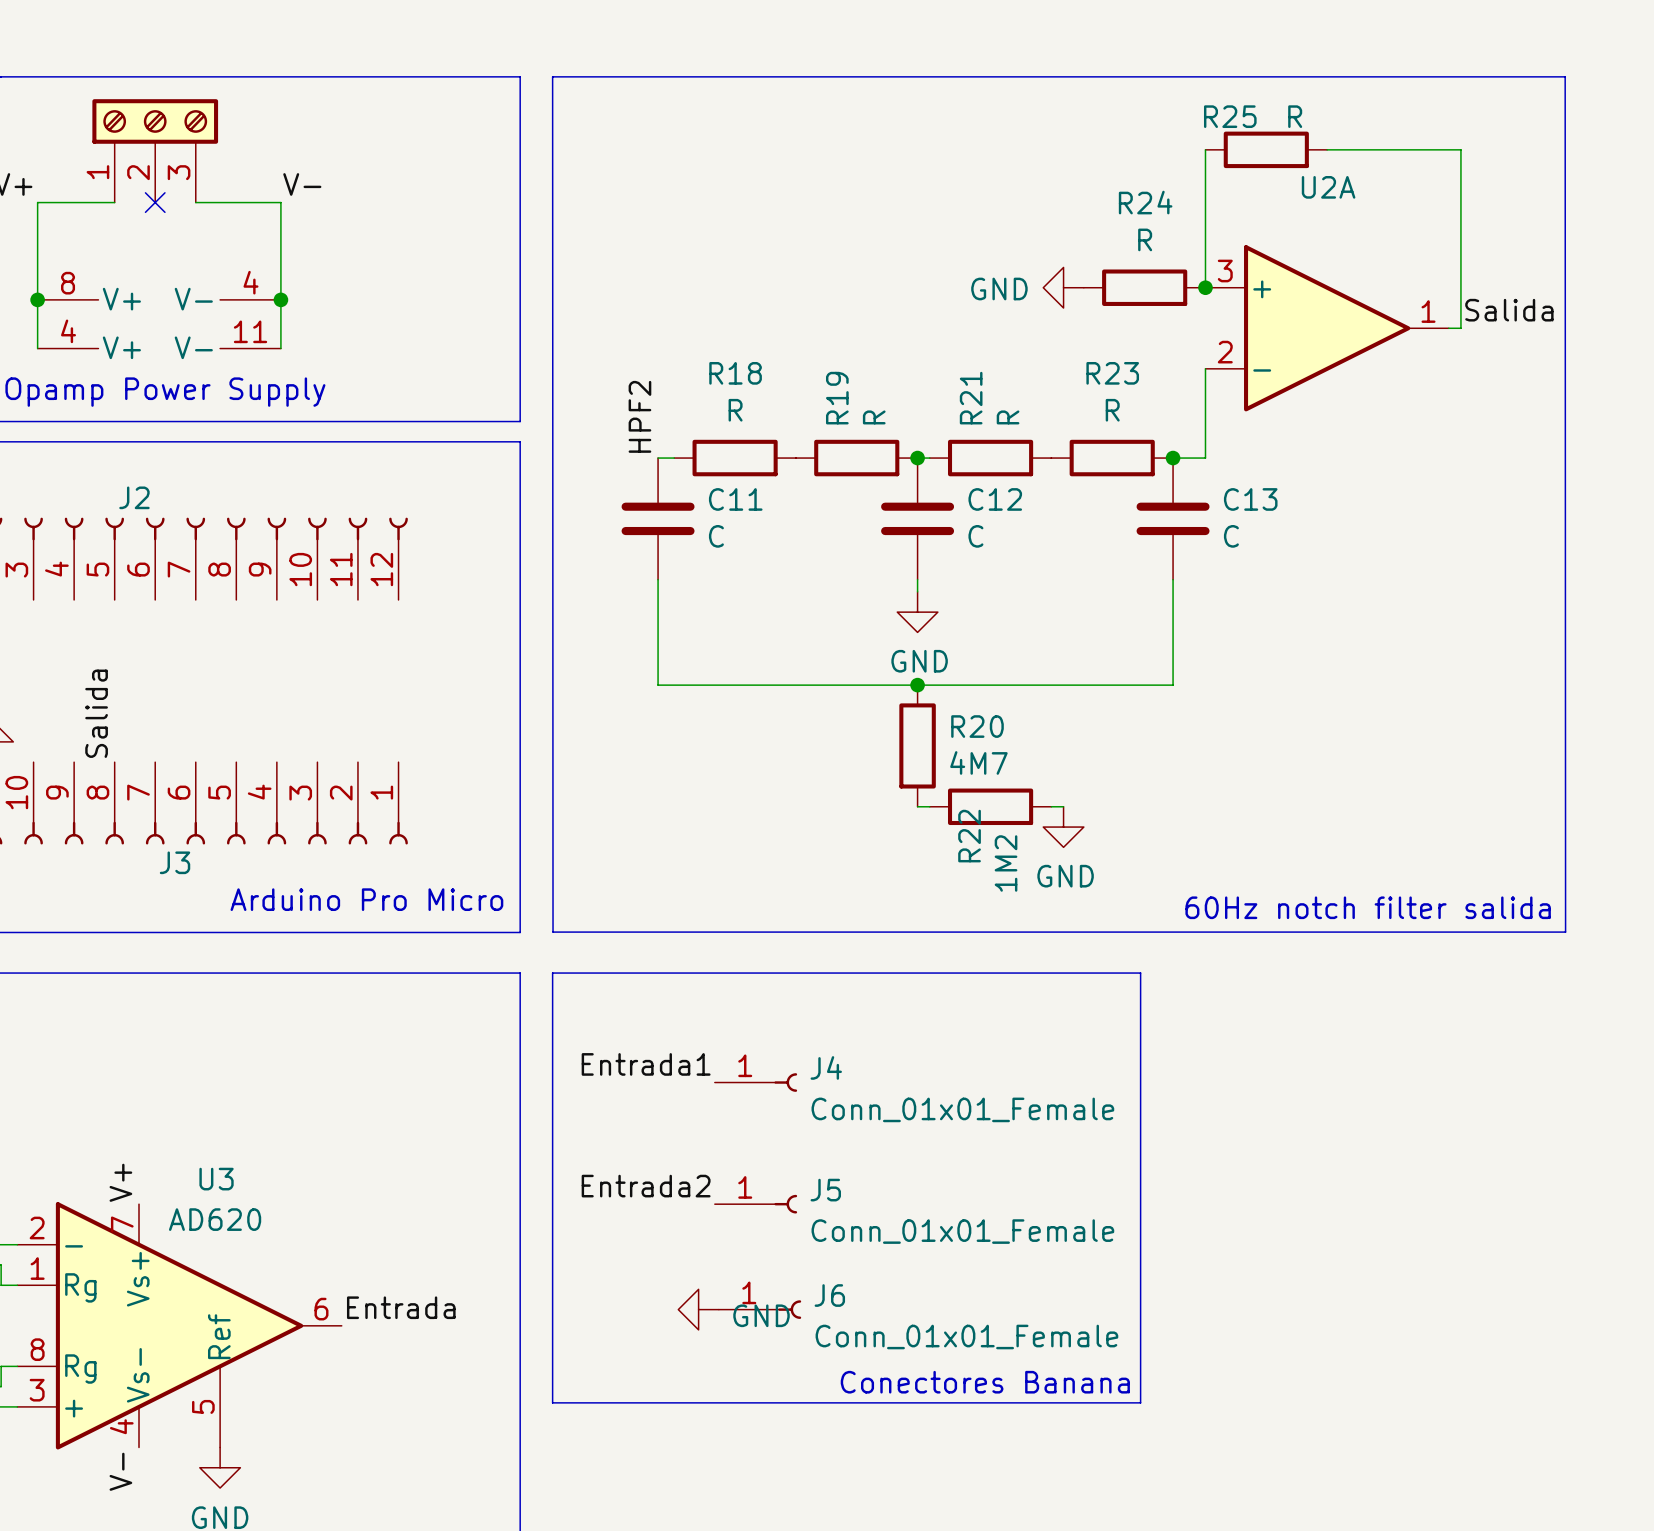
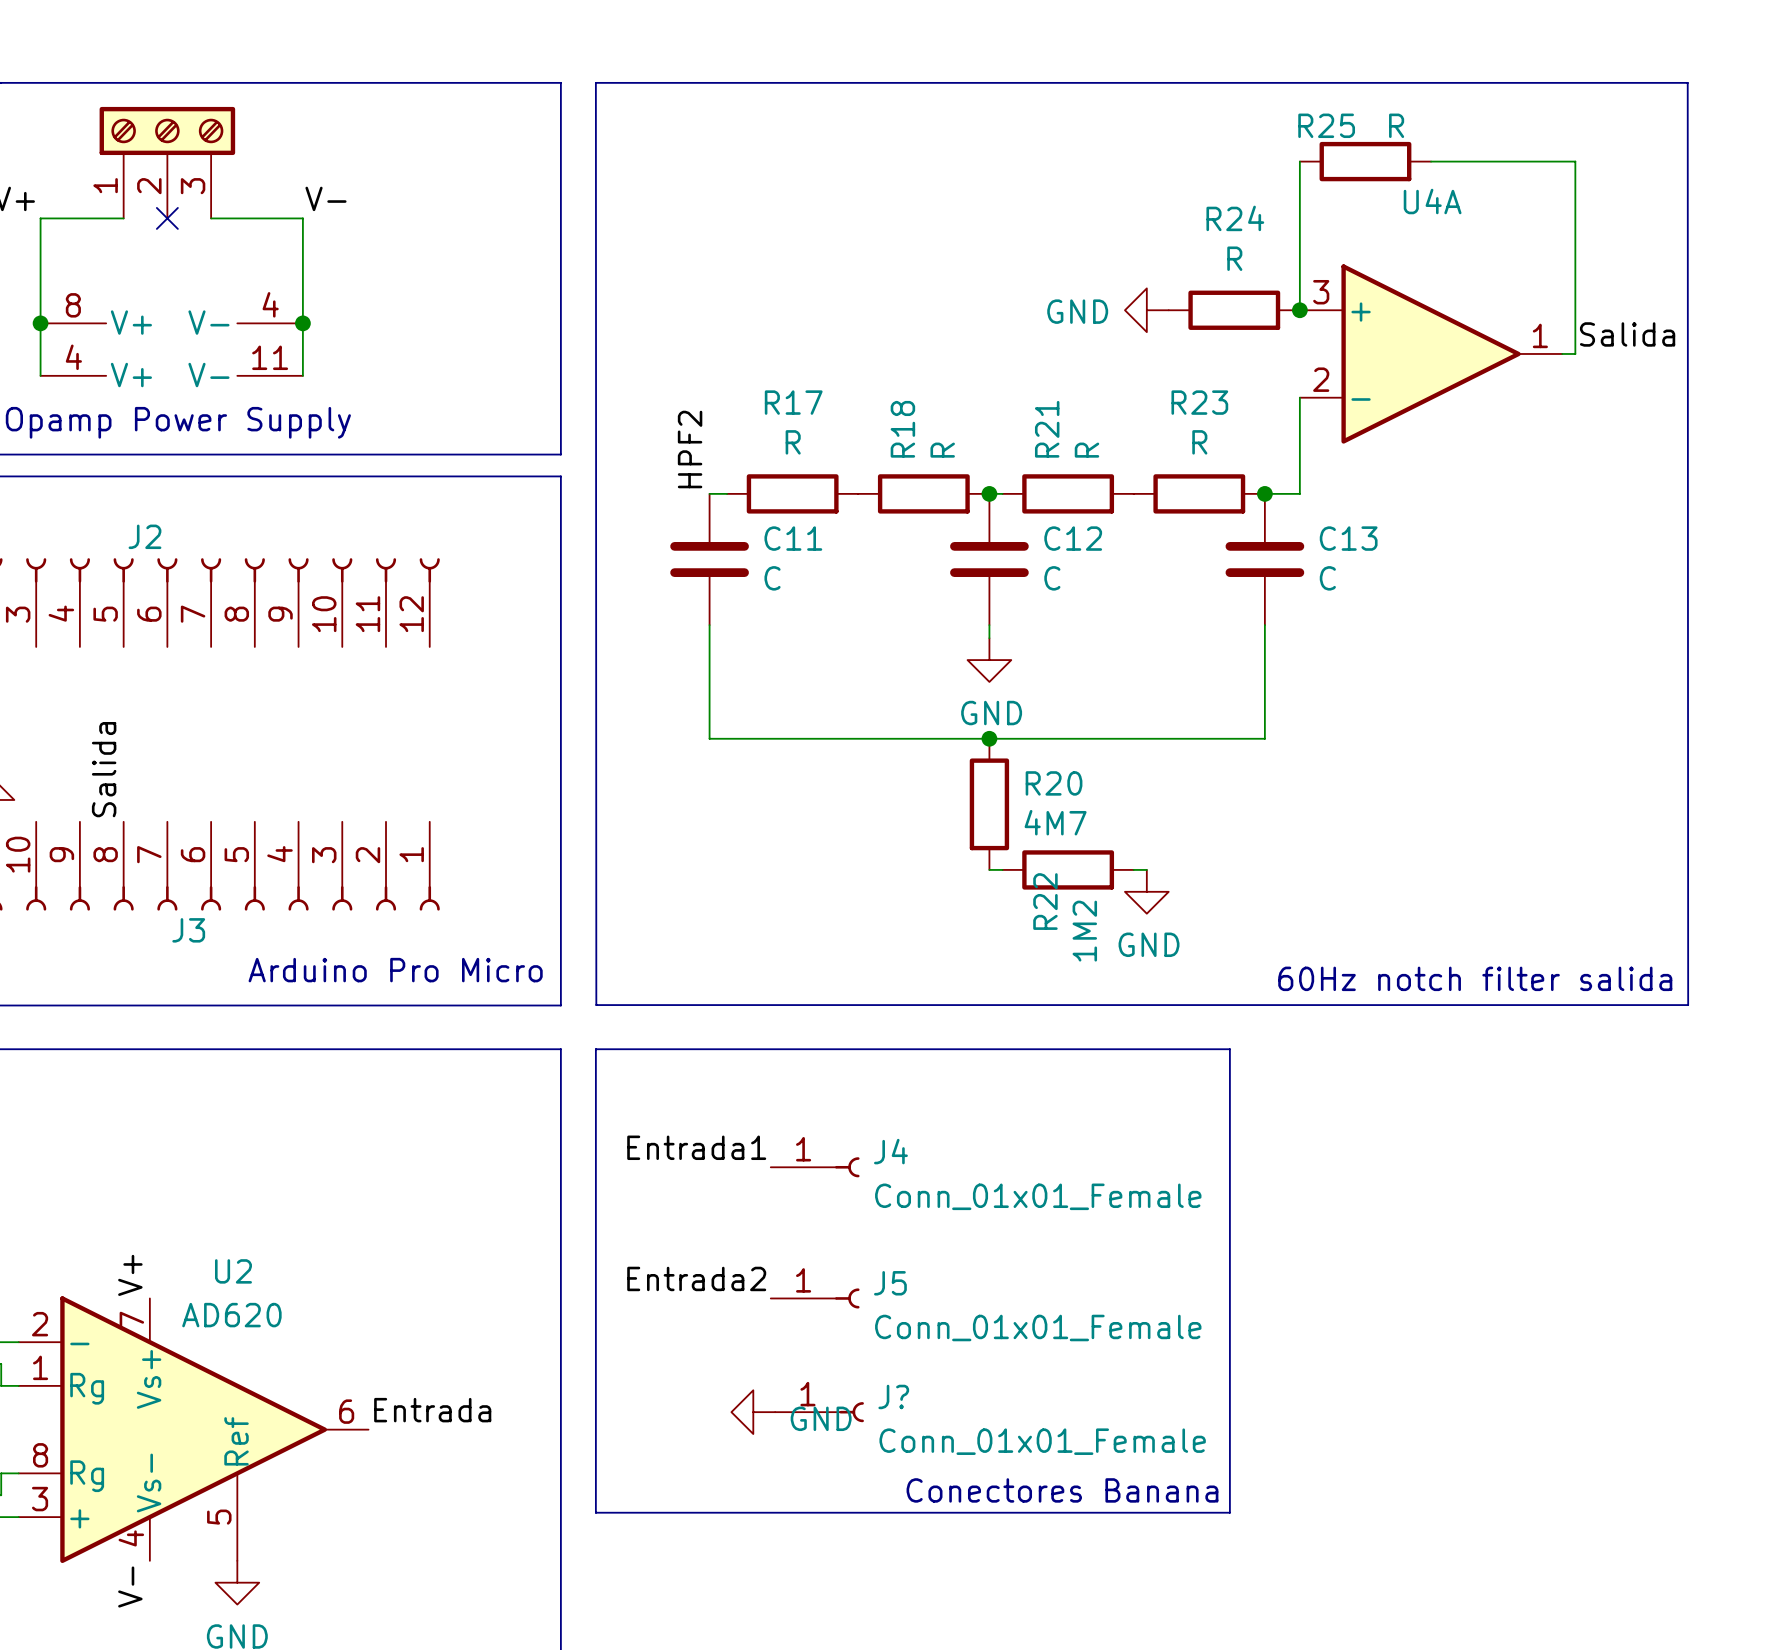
U2A name: U2A (1328, 187) -> U4A (1432, 201)
R18 name: R18 (735, 373) -> R17 (793, 402)
R19 name: R19 (837, 398) -> R18 (902, 429)
U3 name: U3 (216, 1179) -> U2 (233, 1271)
J6 name: J6 (829, 1295) -> J? (893, 1396)

